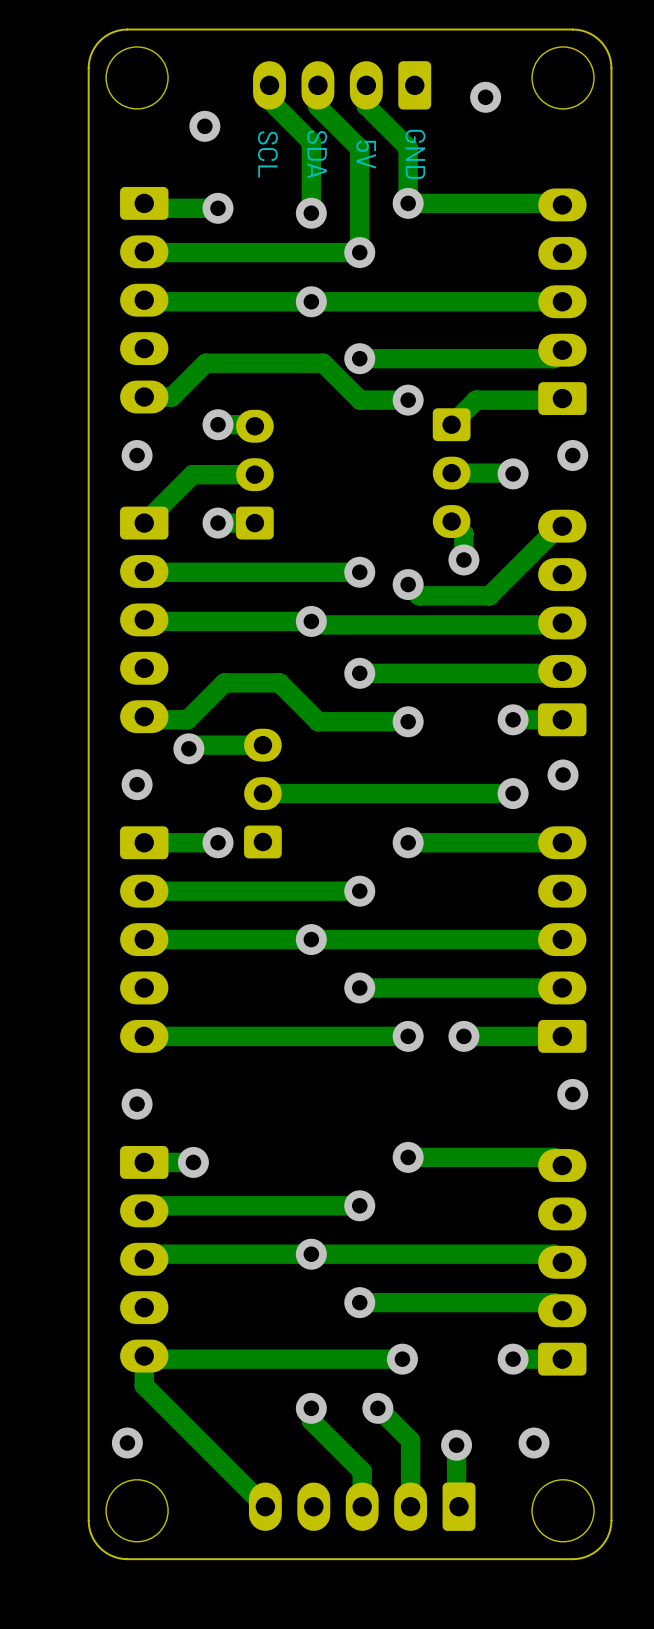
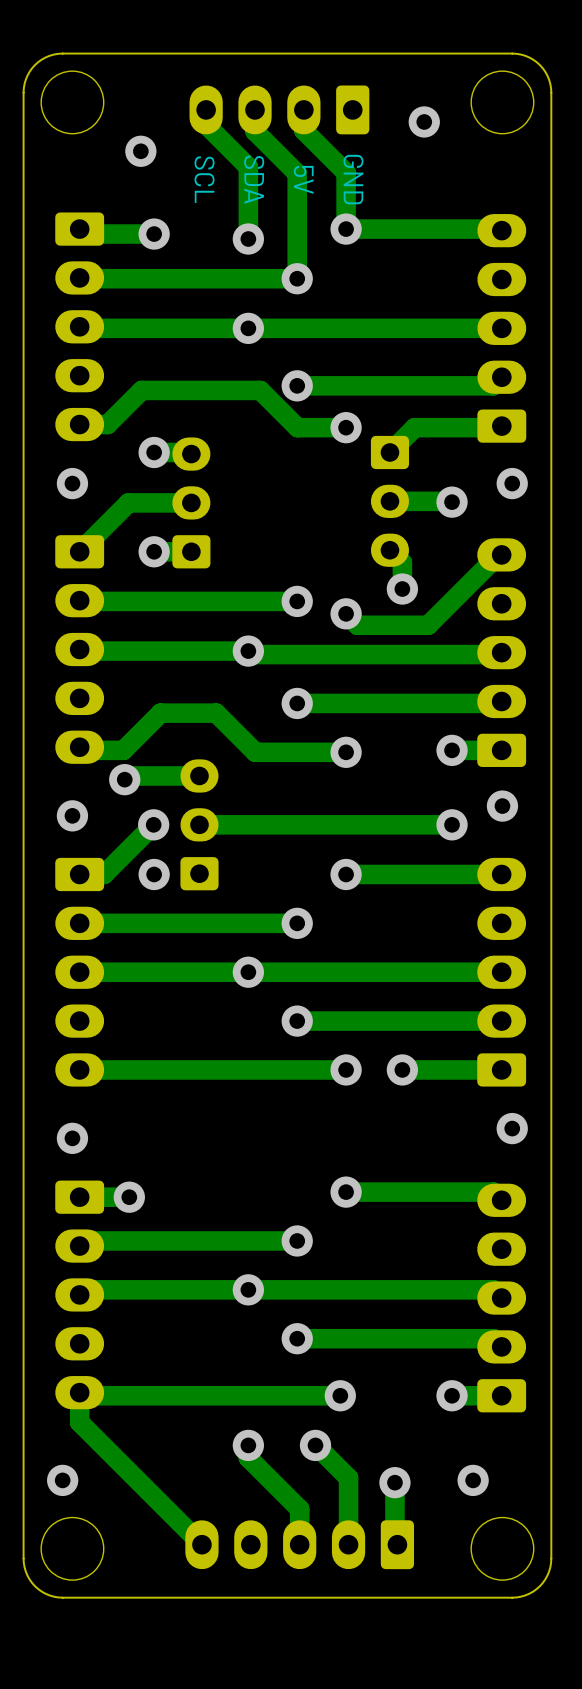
via: none -> (153, 824)
track: (218, 842) (168, 842) -> (153, 824) (104, 874)

